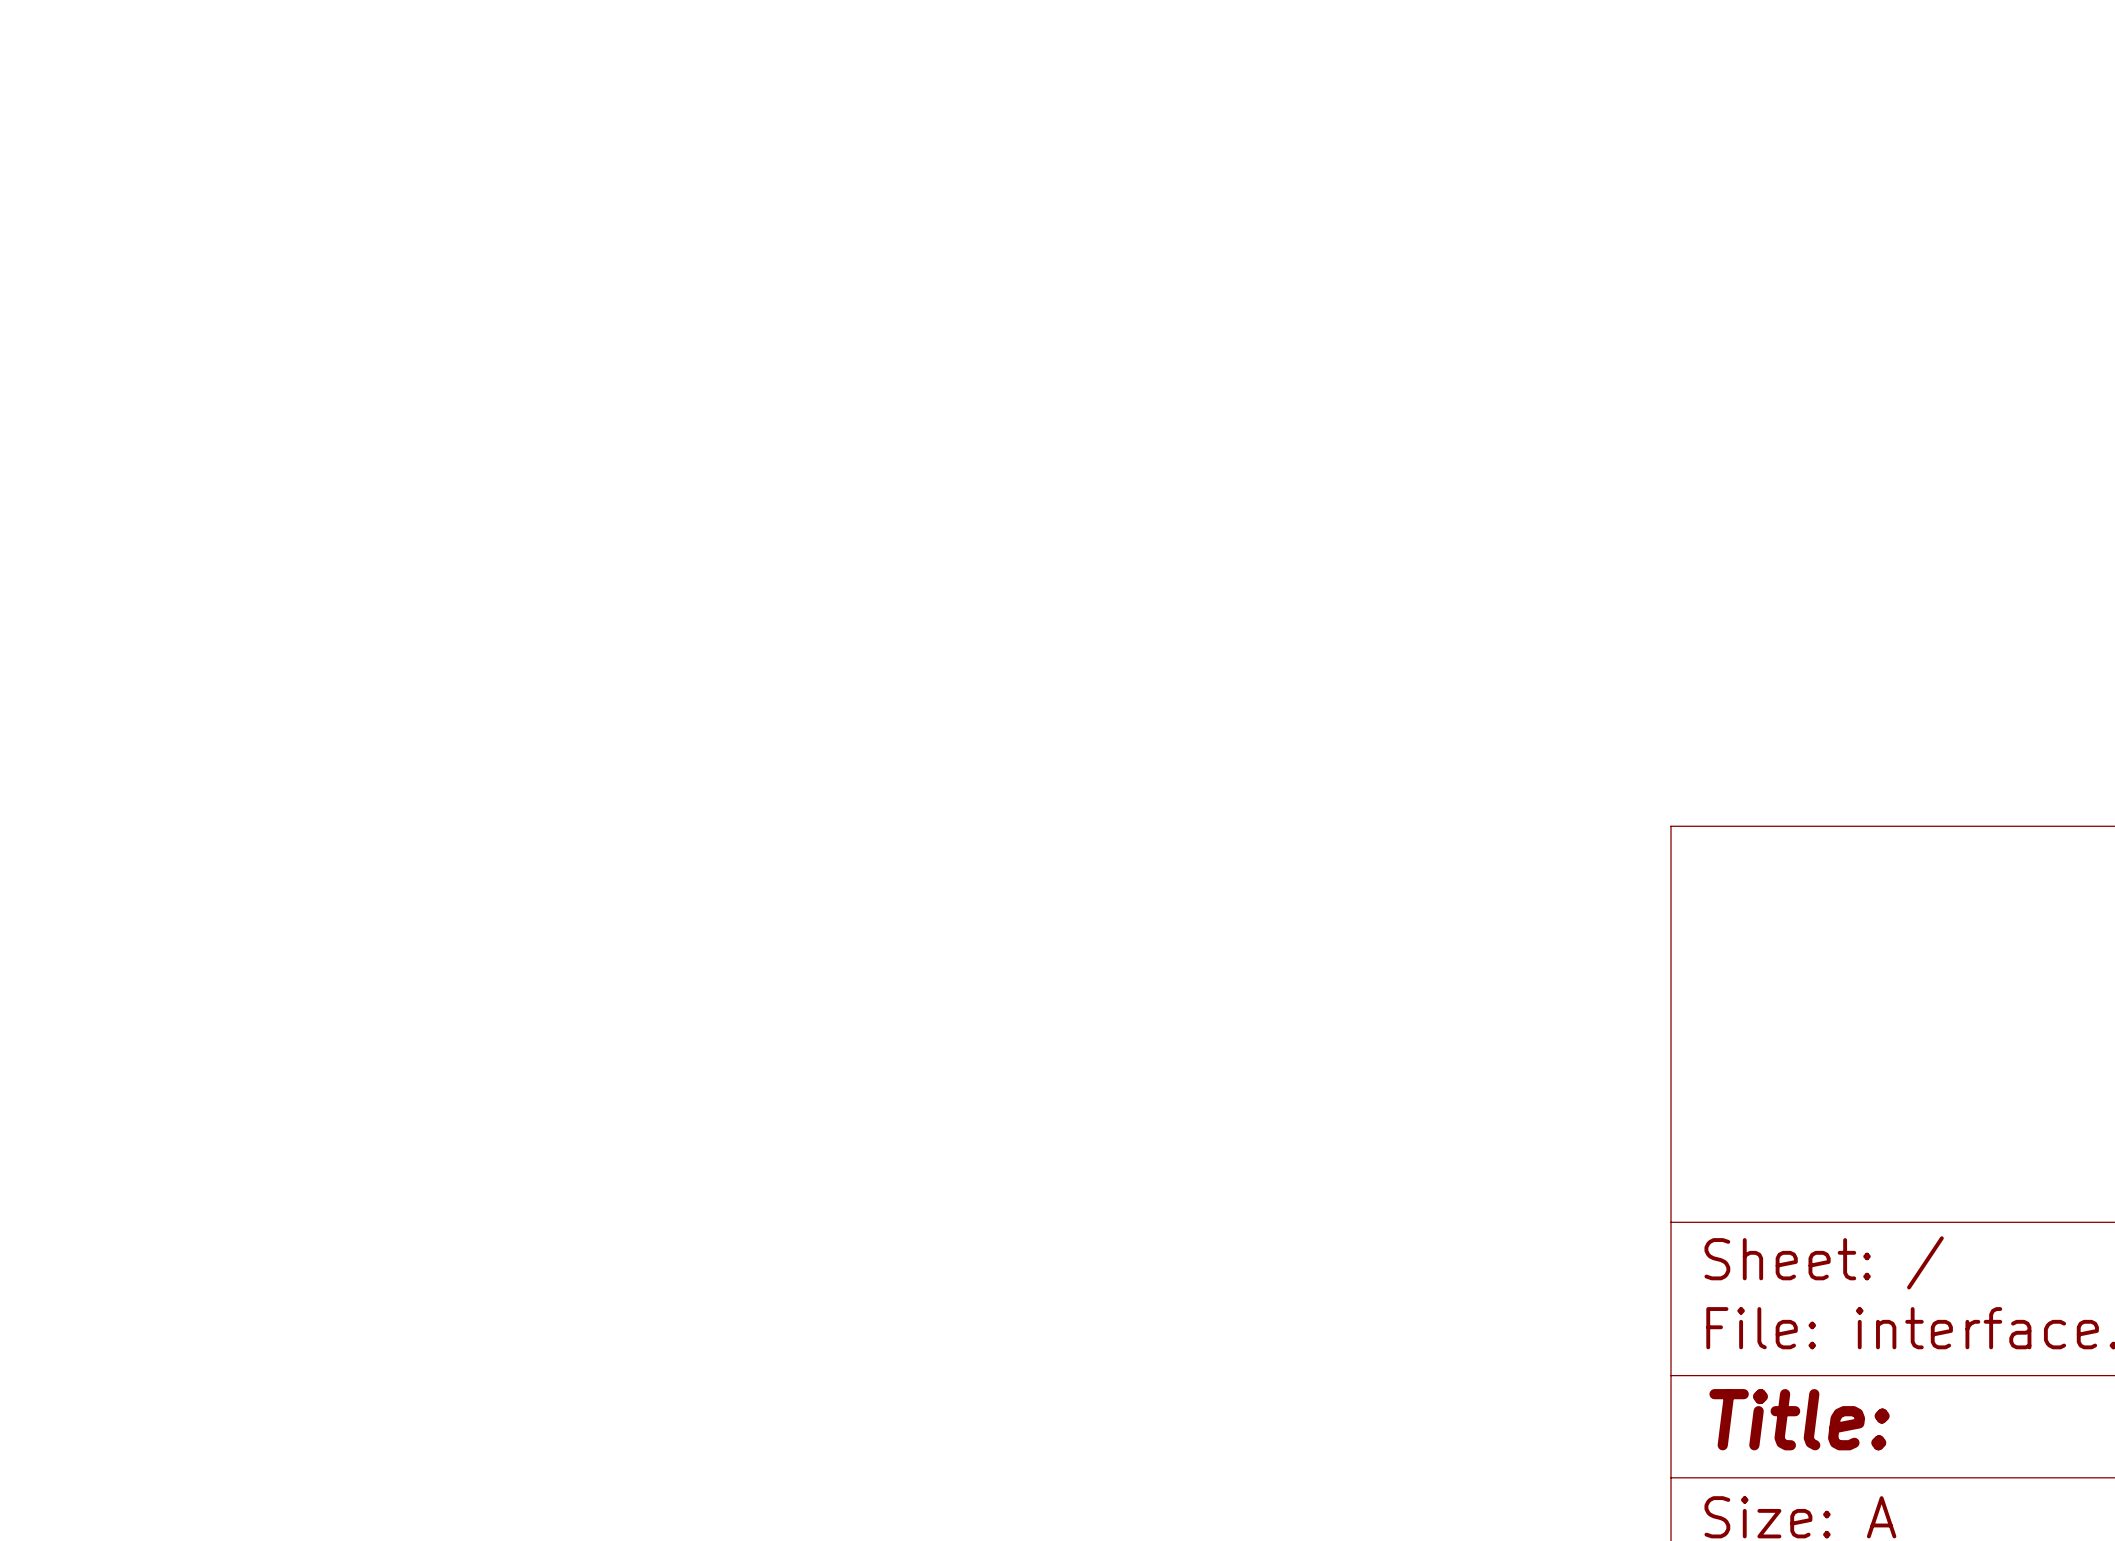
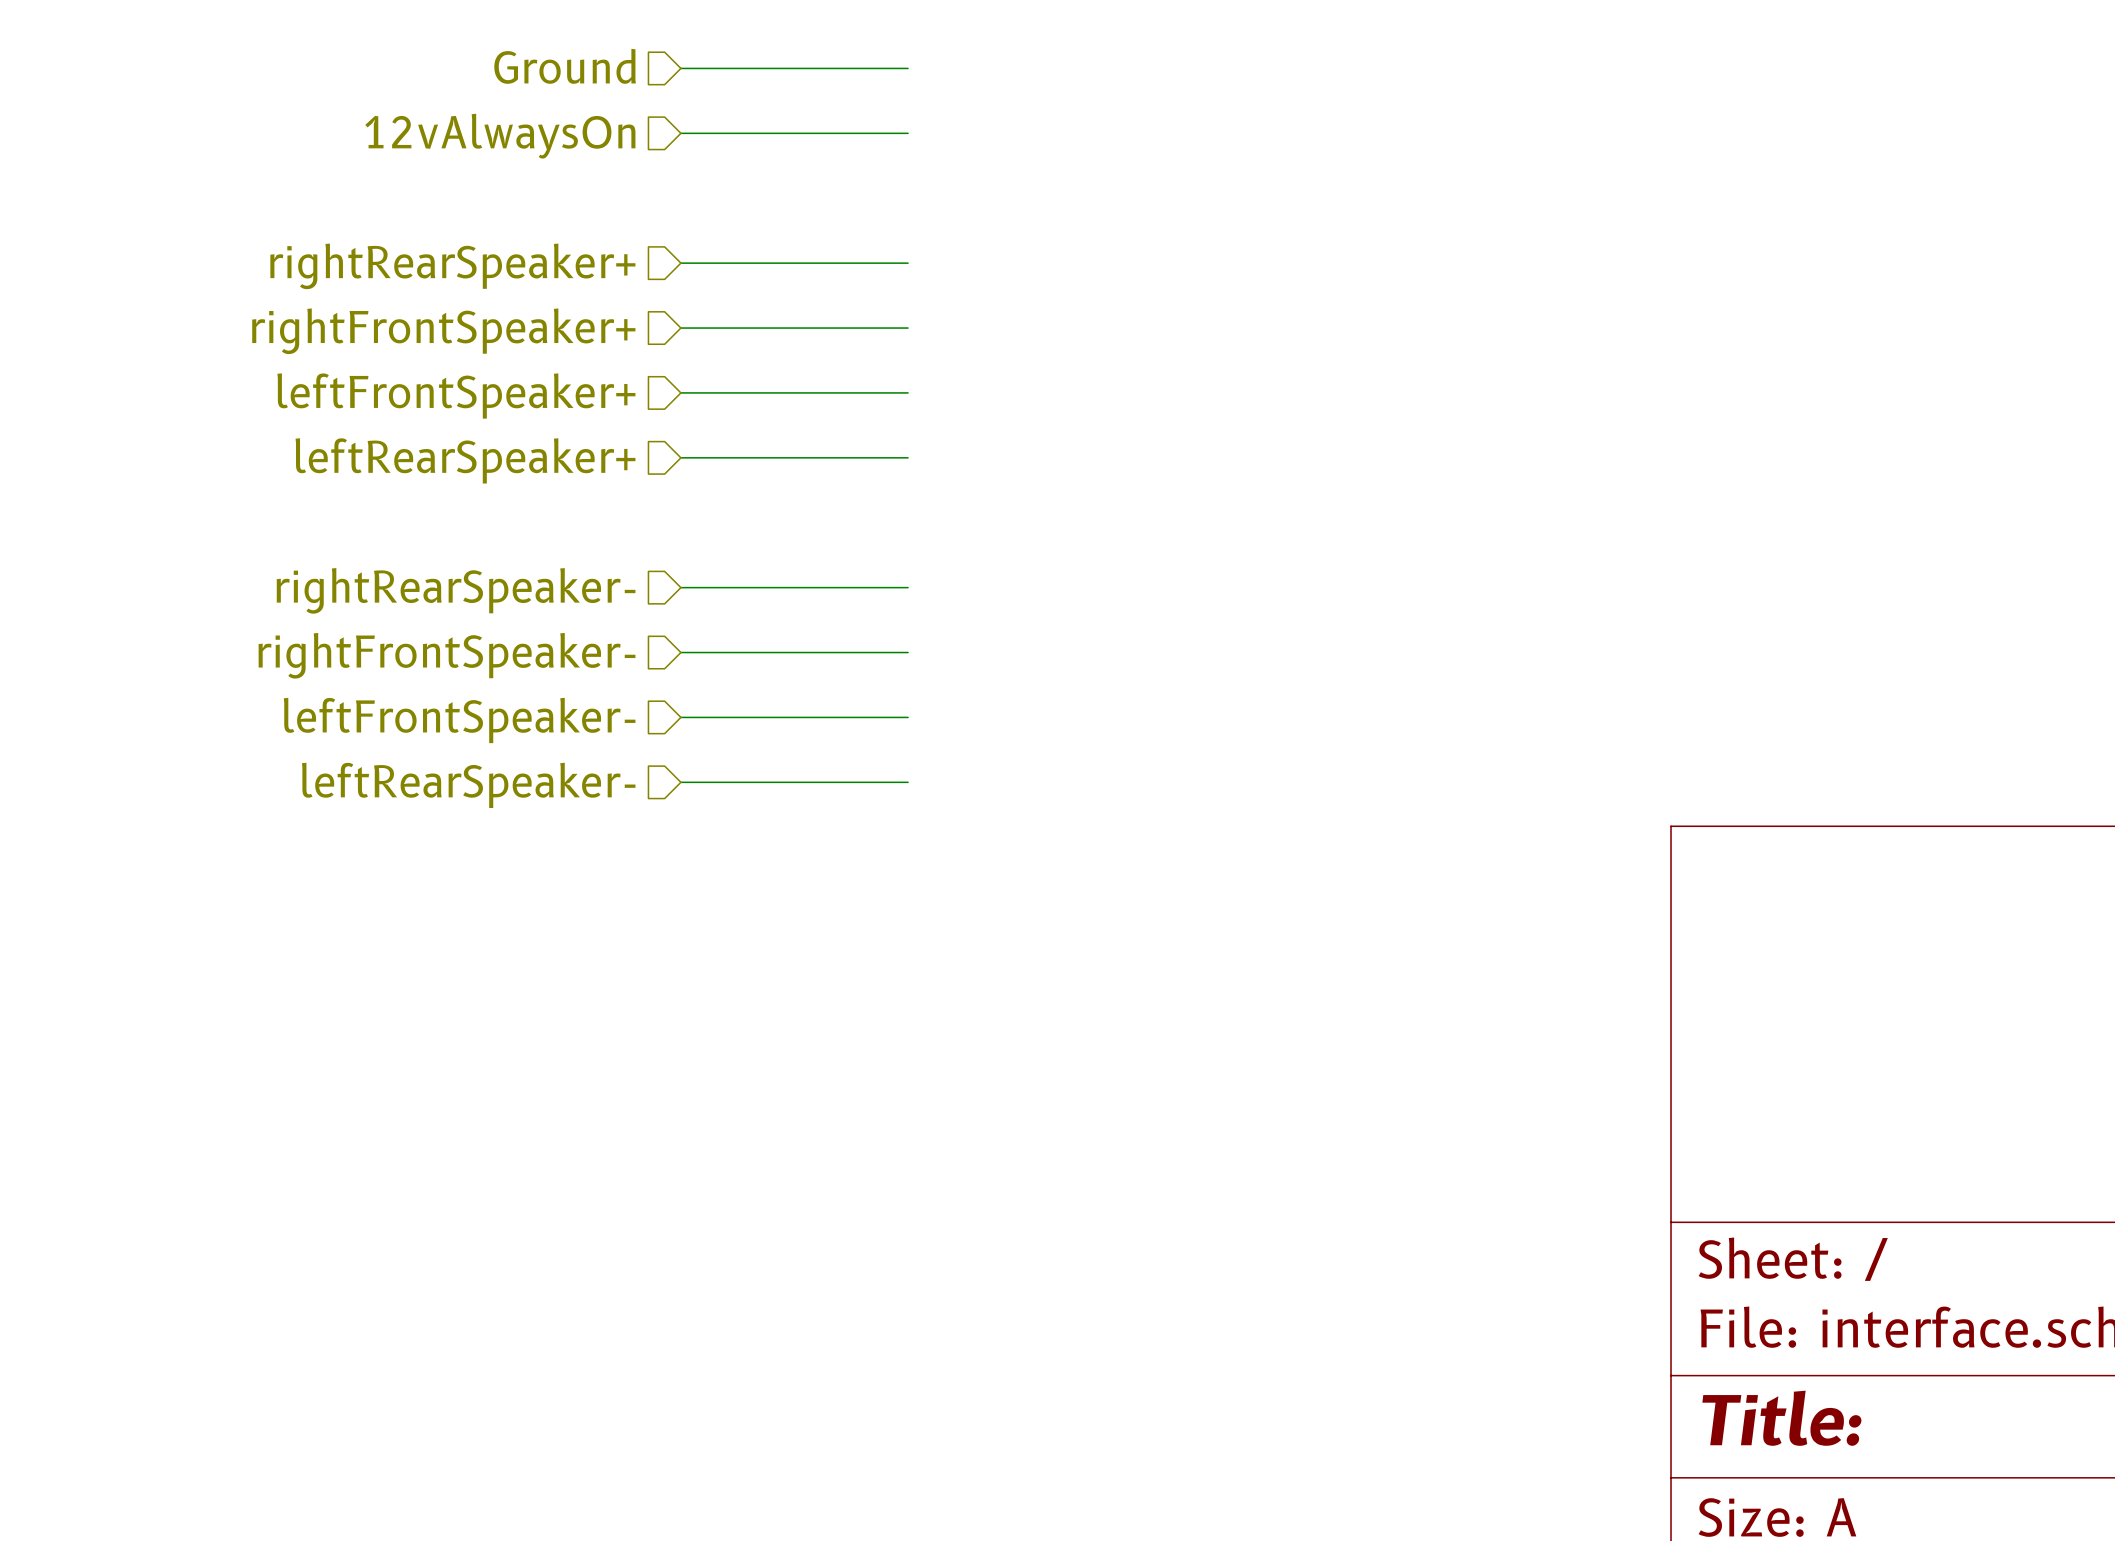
hierarchical label: none -> Ground (565, 66)
wire: none -> (680, 68) (908, 68)
wire: none -> (680, 133) (908, 133)
hierarchical label: none -> 12vAlwaysOn (500, 136)
wire: none -> (680, 263) (908, 263)
hierarchical label: none -> rightRearSpeaker+ (452, 266)
wire: none -> (680, 328) (908, 328)
hierarchical label: none -> rightFrontSpeaker+ (443, 331)
wire: none -> (680, 392) (908, 392)
hierarchical label: none -> leftFrontSpeaker+ (456, 395)
wire: none -> (680, 457) (908, 457)
hierarchical label: none -> leftRearSpeaker+ (465, 460)
wire: none -> (680, 587) (908, 587)
hierarchical label: none -> rightRearSpeaker- (456, 590)
wire: none -> (680, 652) (908, 652)
hierarchical label: none -> rightFrontSpeaker- (447, 655)
wire: none -> (680, 717) (908, 717)
hierarchical label: none -> leftFrontSpeaker- (459, 720)
wire: none -> (680, 782) (908, 782)
hierarchical label: none -> leftRearSpeaker- (468, 785)

